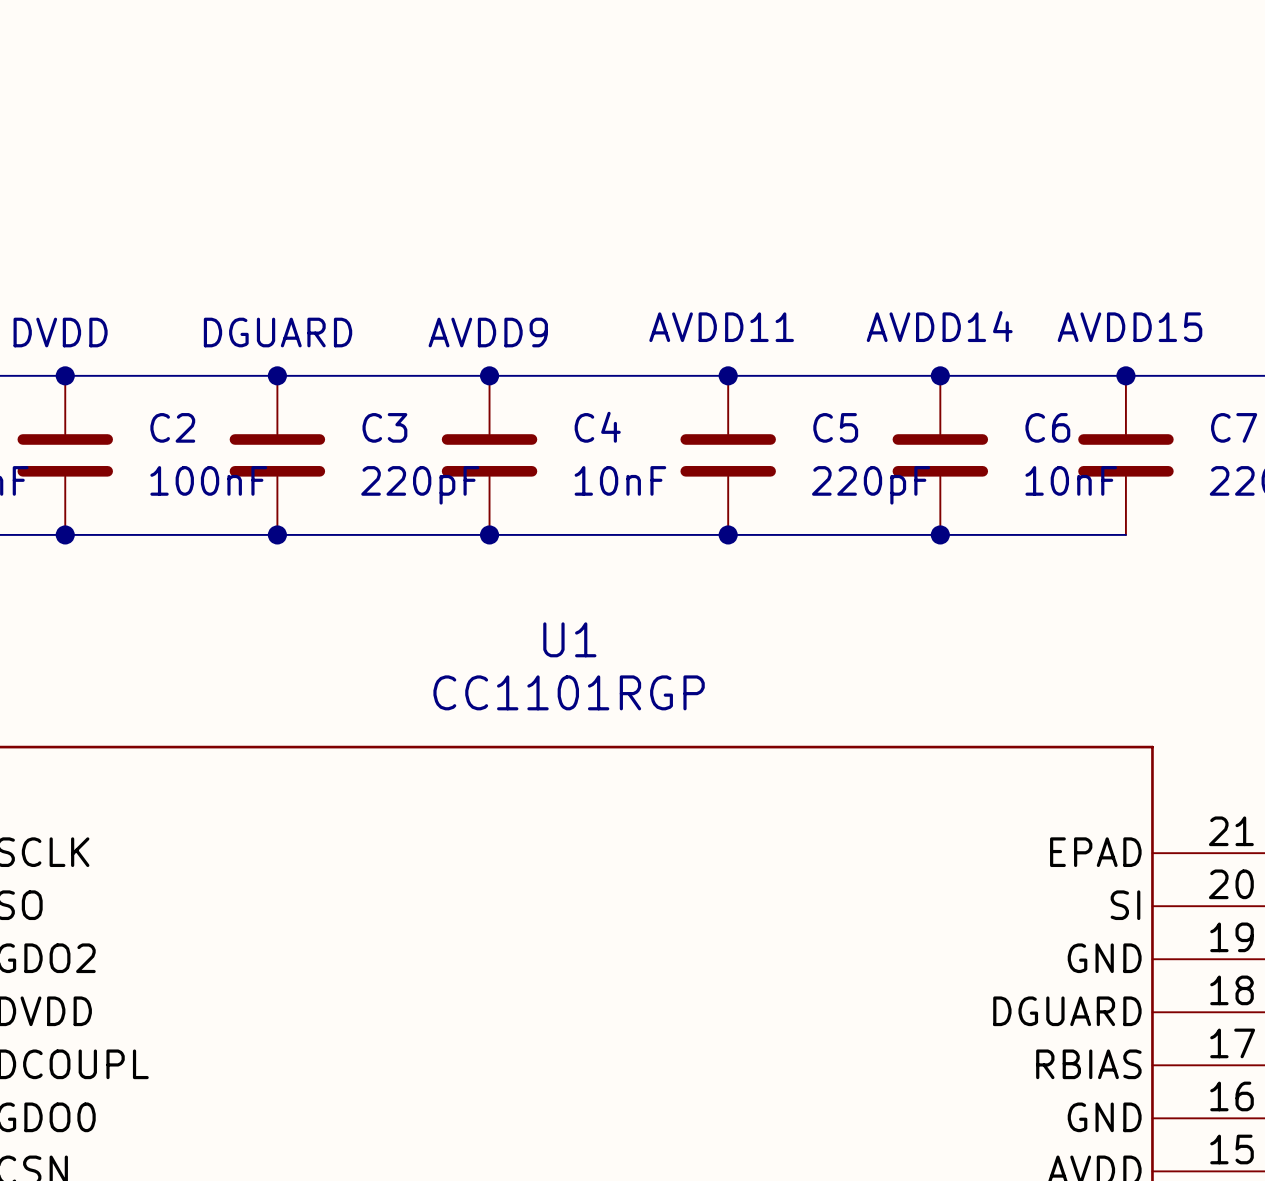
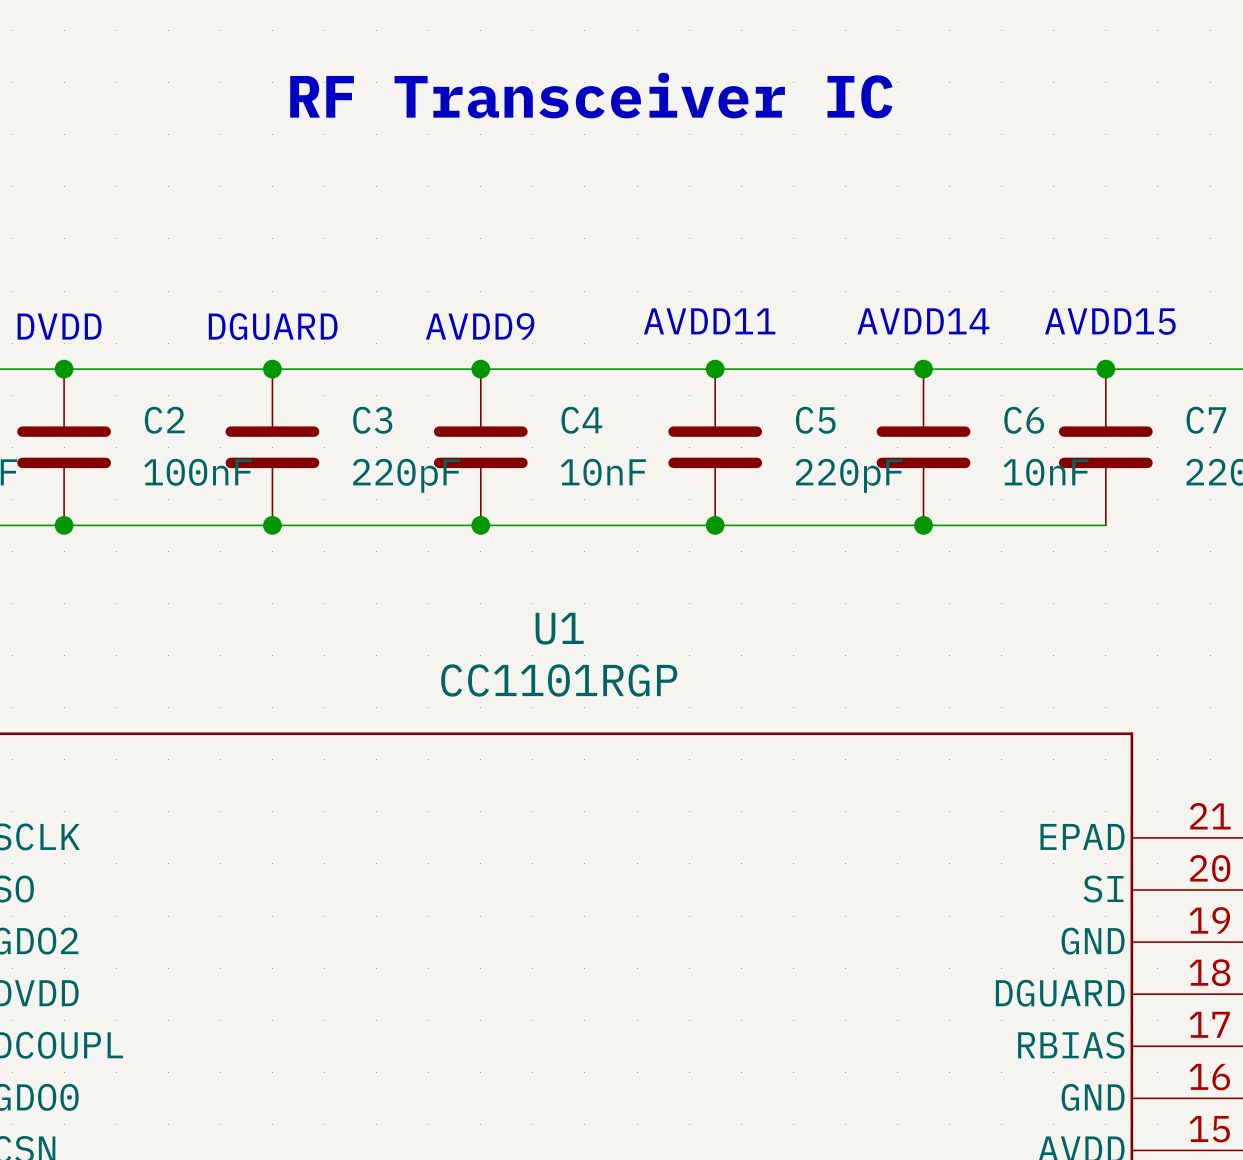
text: none -> RF Transceiver IC (591, 95)

